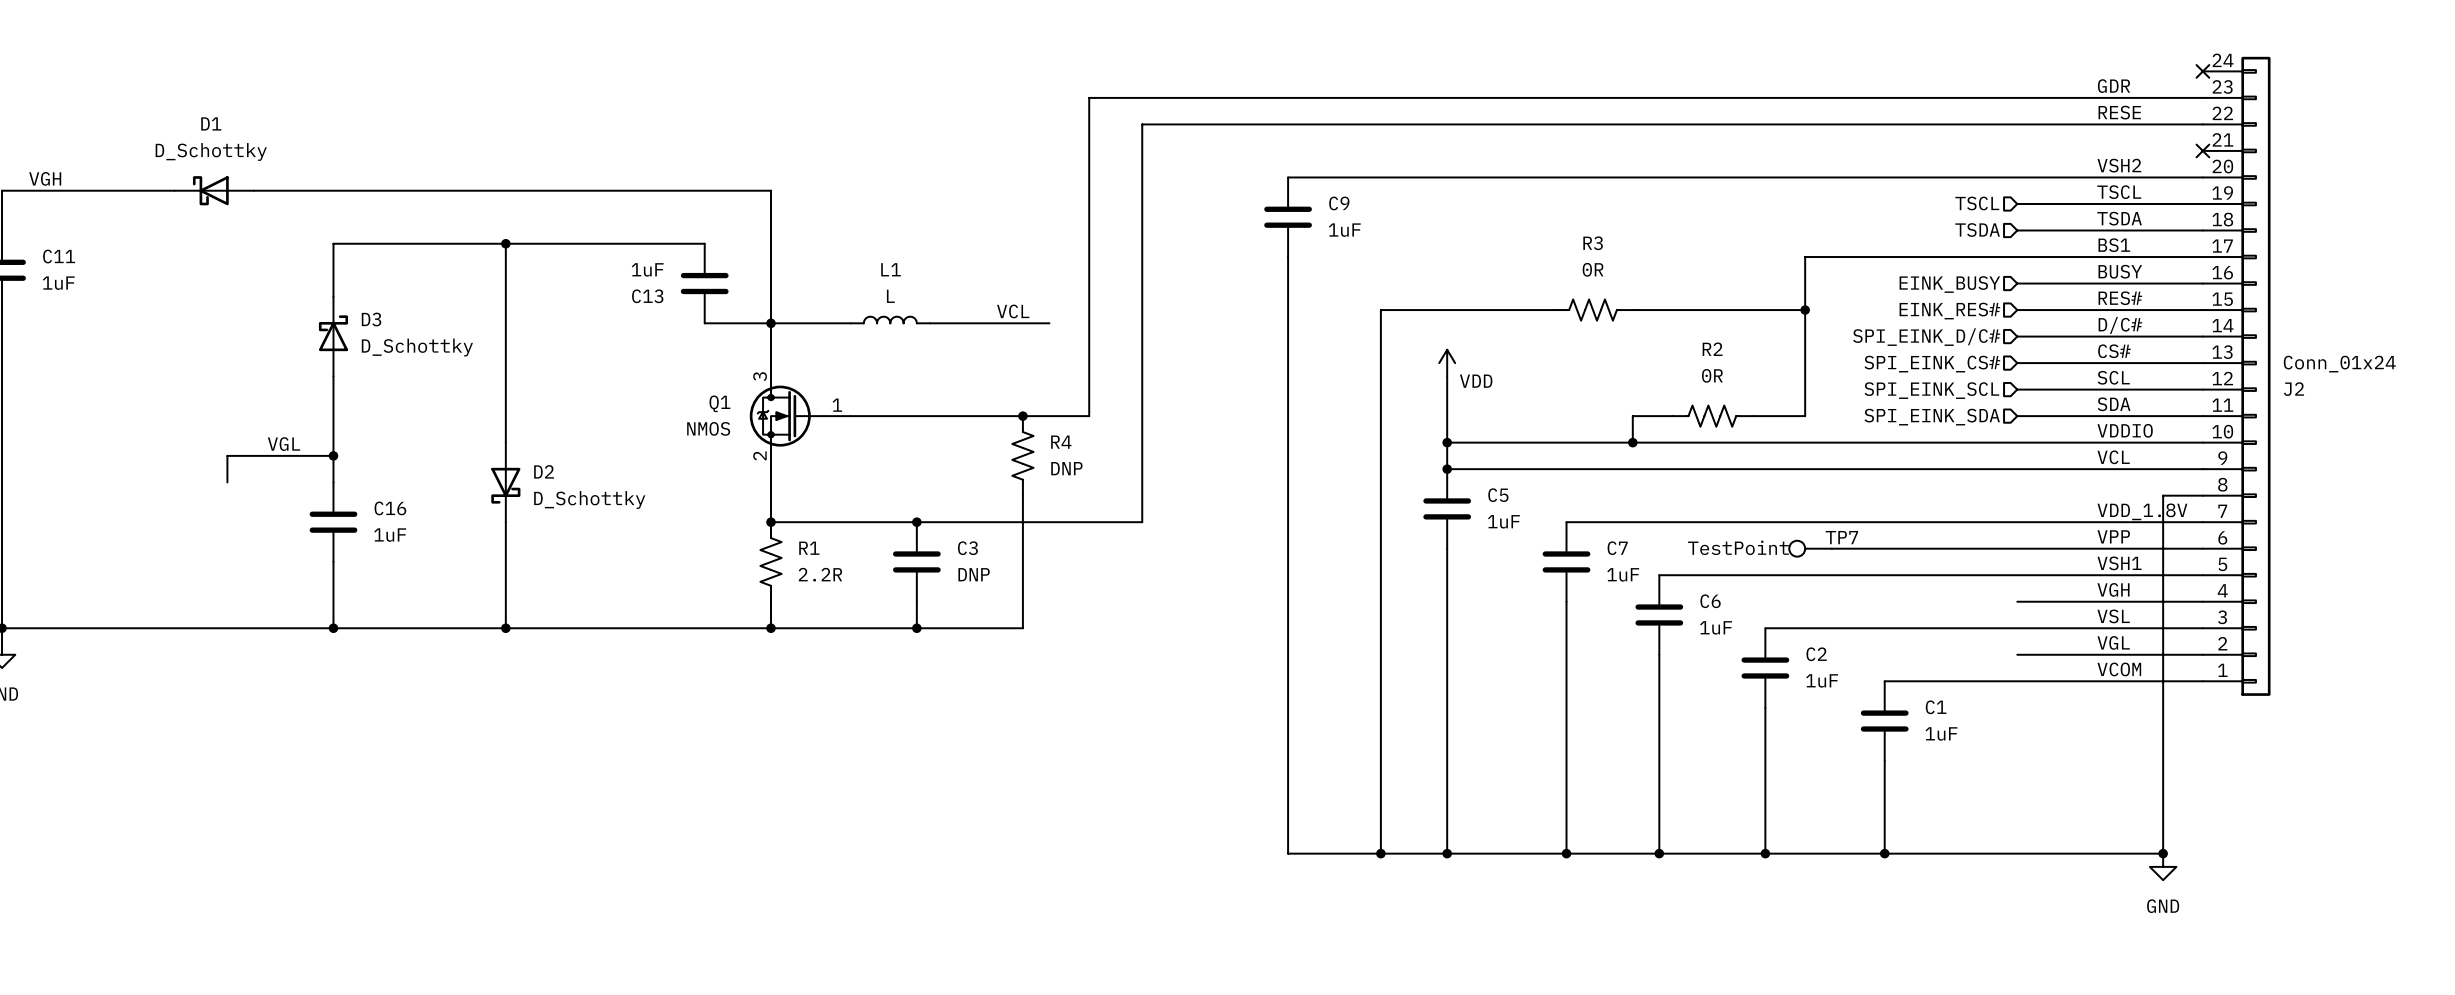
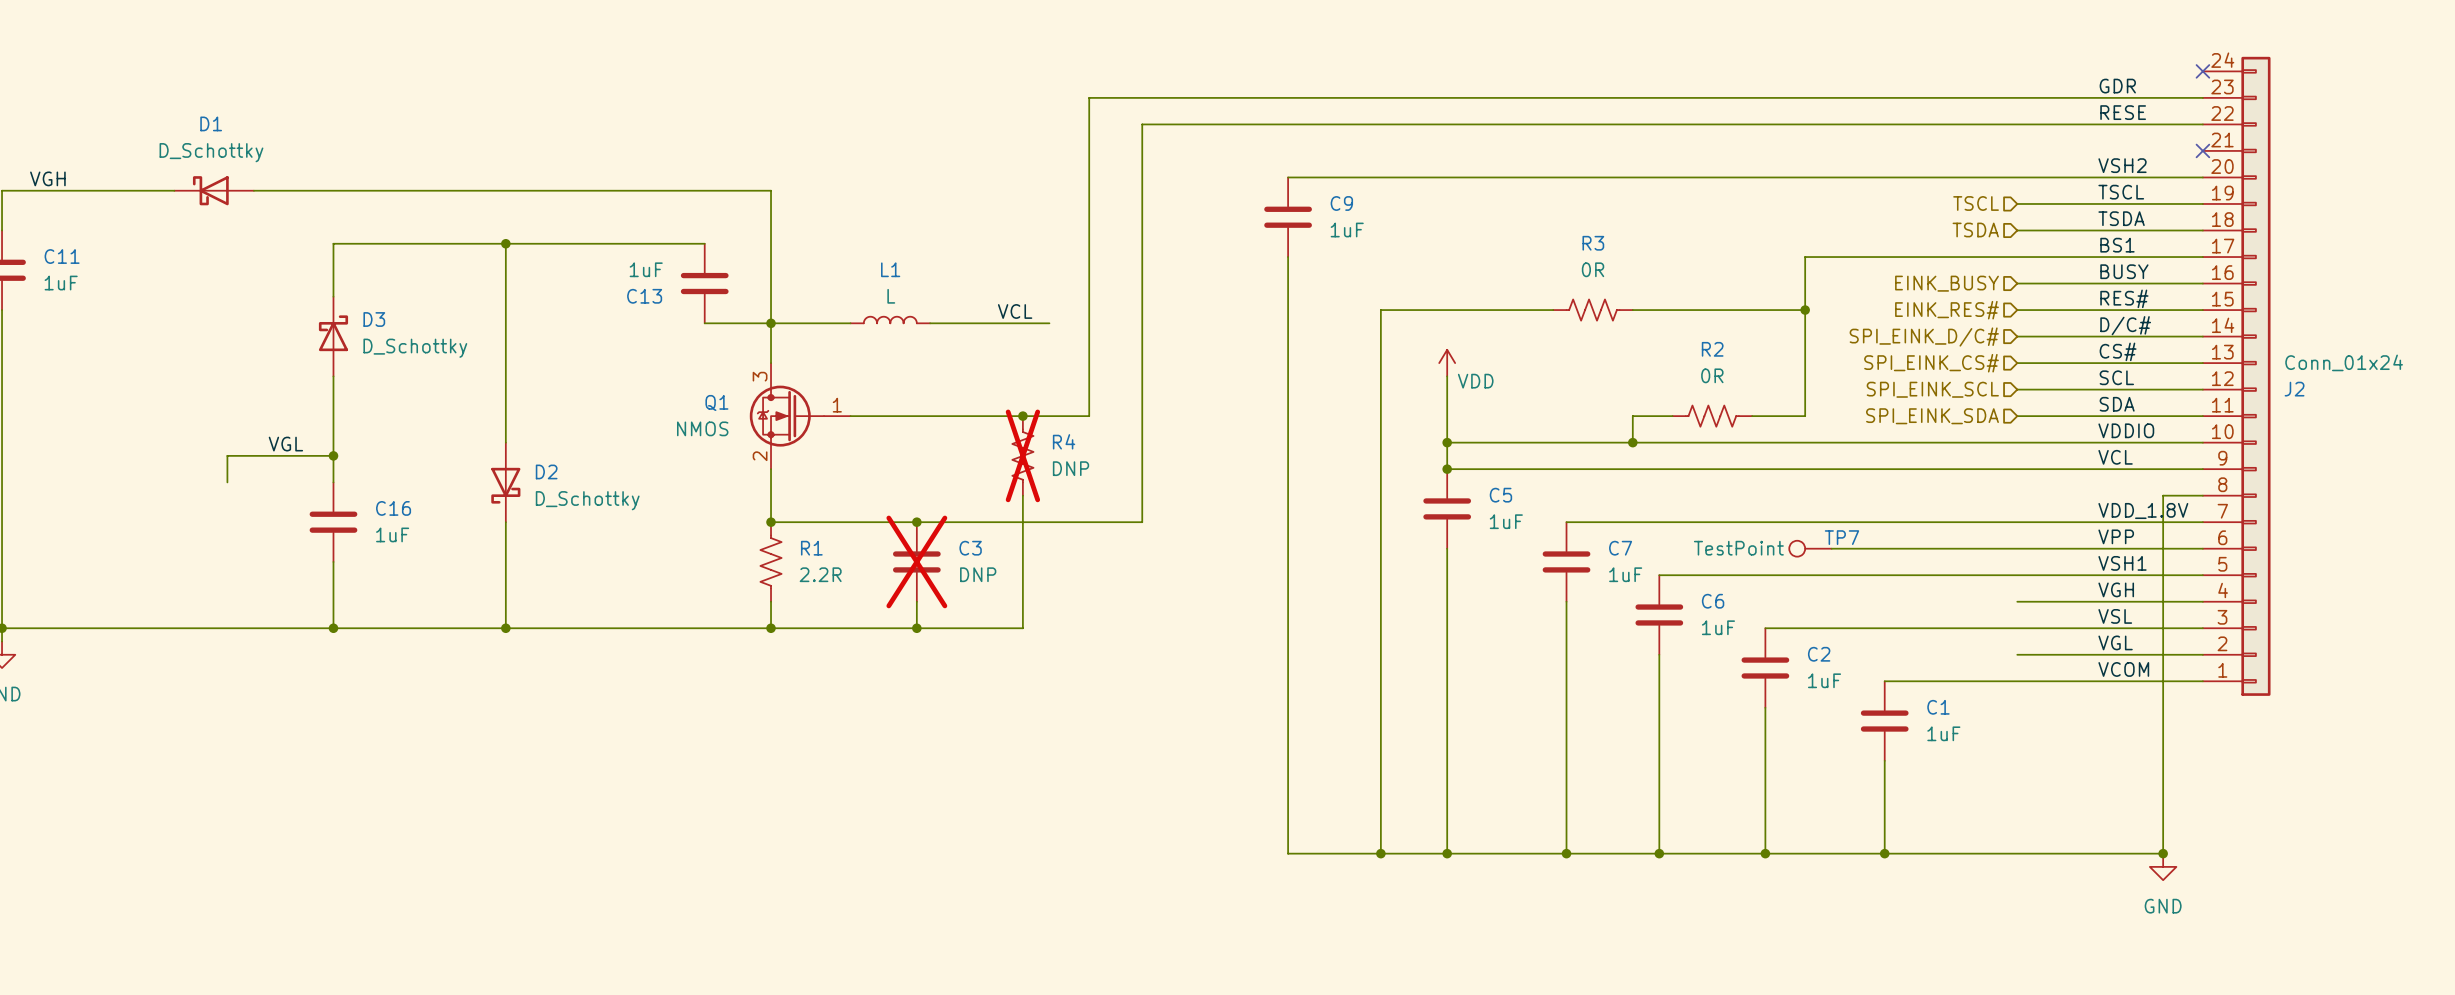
R4 do-not-place cross: none -> (1022, 455)
C3 do-not-place cross: none -> (916, 561)

